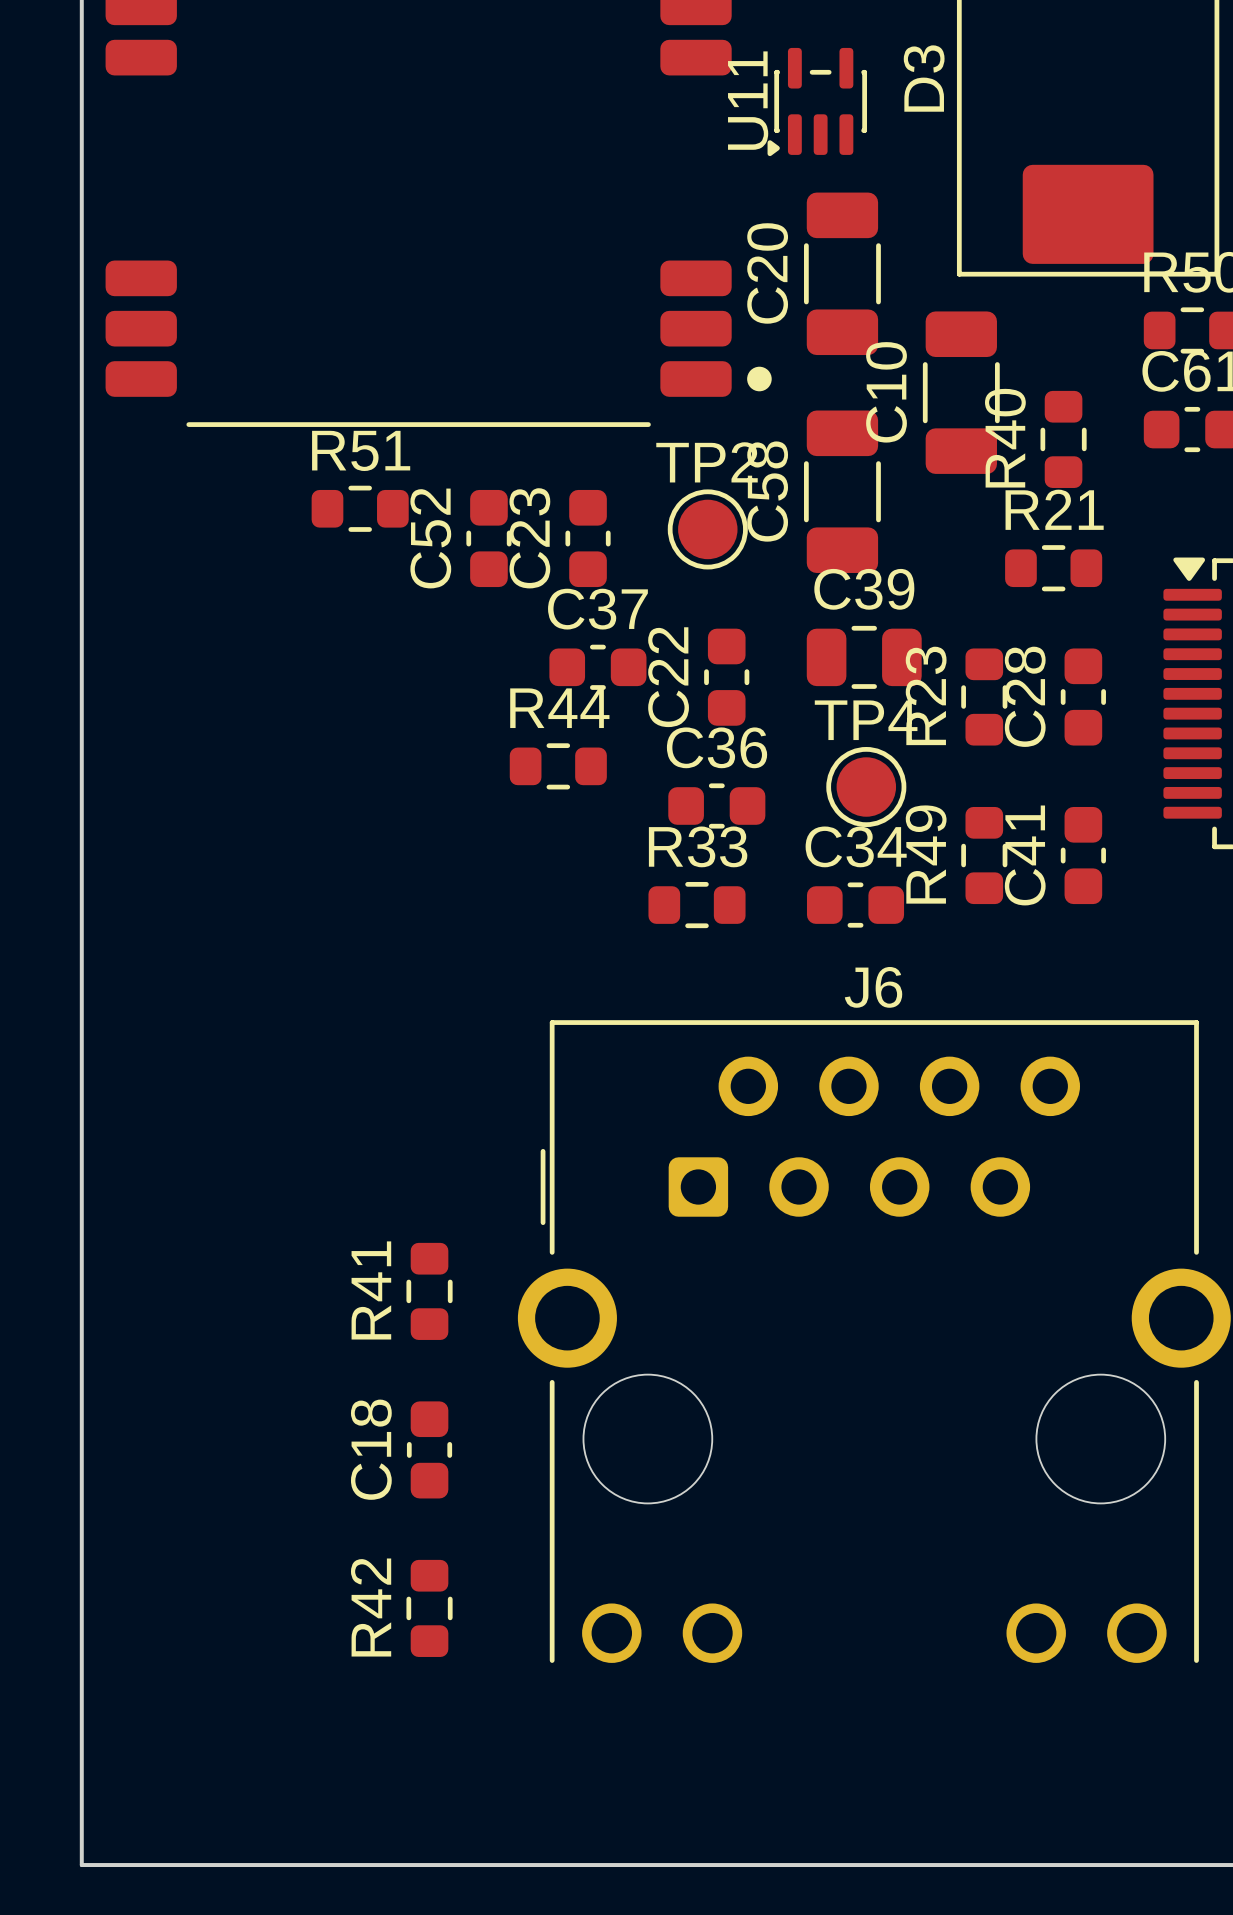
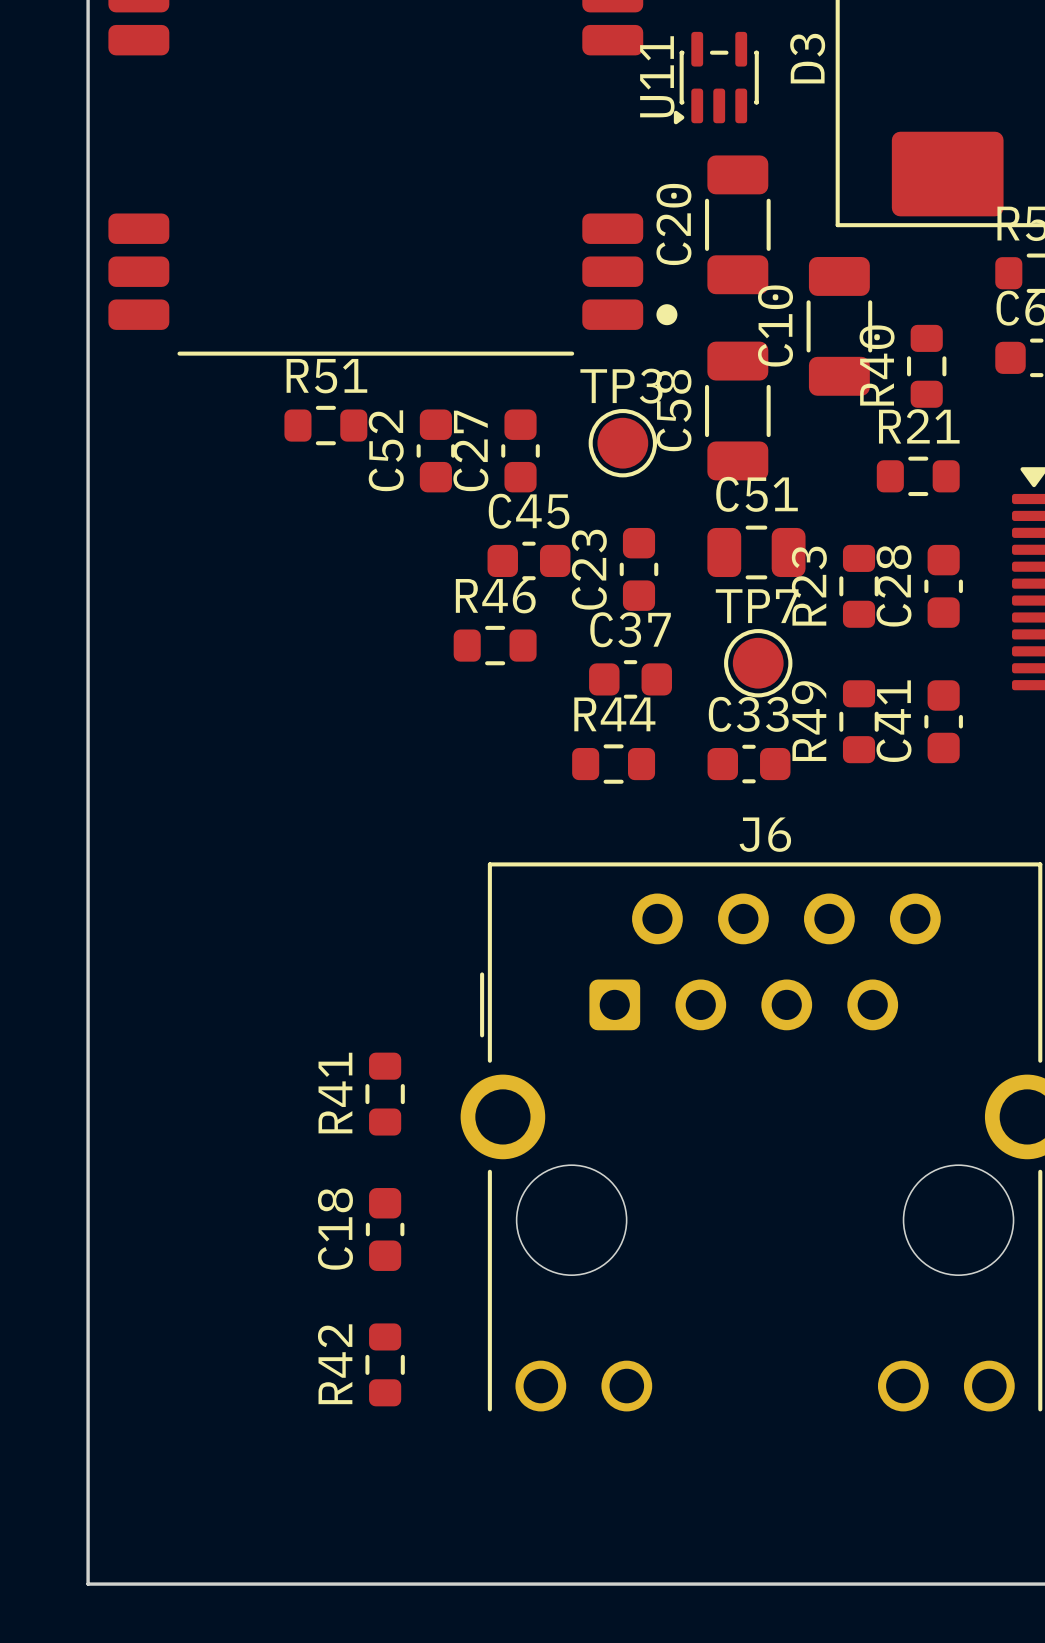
TP2 name: TP2 (707, 462) -> TP3 (621, 386)
C23 name: C23 (529, 538) -> C27 (470, 450)
C39 name: C39 (864, 589) -> C51 (757, 494)
C37 name: C37 (597, 609) -> C45 (529, 511)
C22 name: C22 (668, 677) -> C23 (589, 569)
R44 name: R44 (559, 708) -> R46 (495, 596)
TP4 name: TP4 (866, 720) -> TP7 (757, 606)
C36 name: C36 (717, 747) -> C37 (630, 629)
R33 name: R33 (698, 846) -> R44 (614, 714)
C34 name: C34 (856, 846) -> C33 (748, 714)

